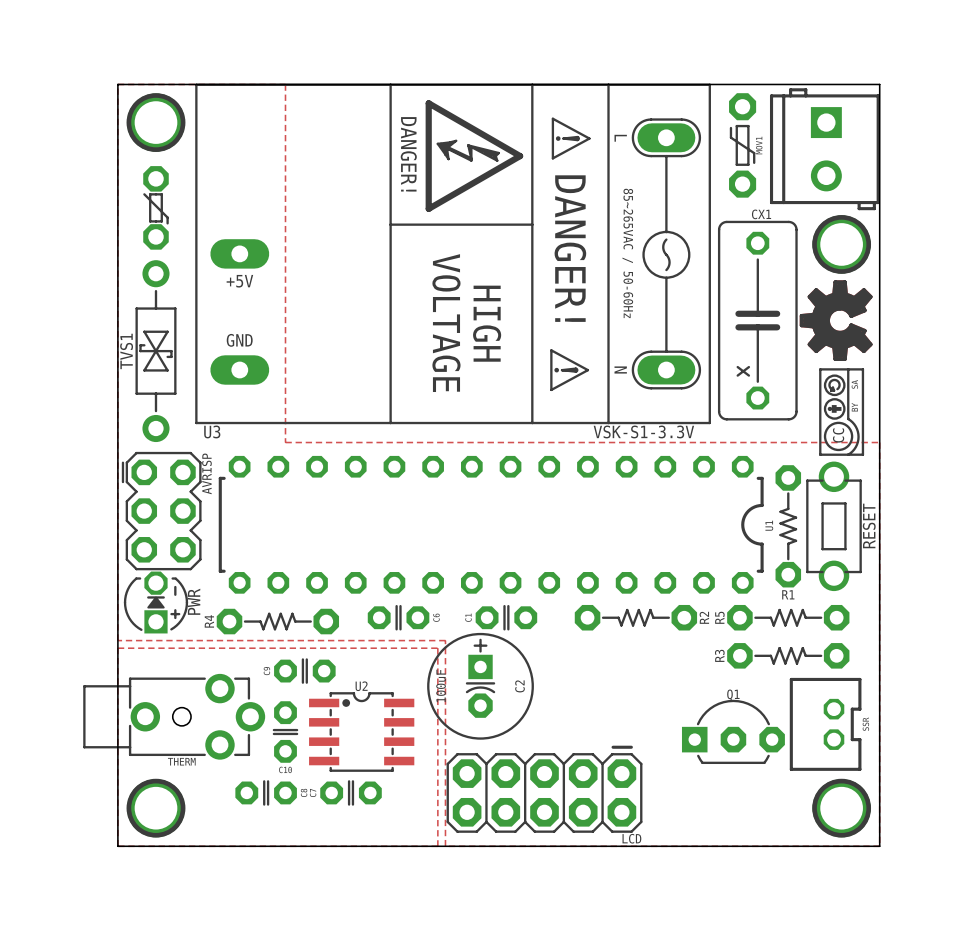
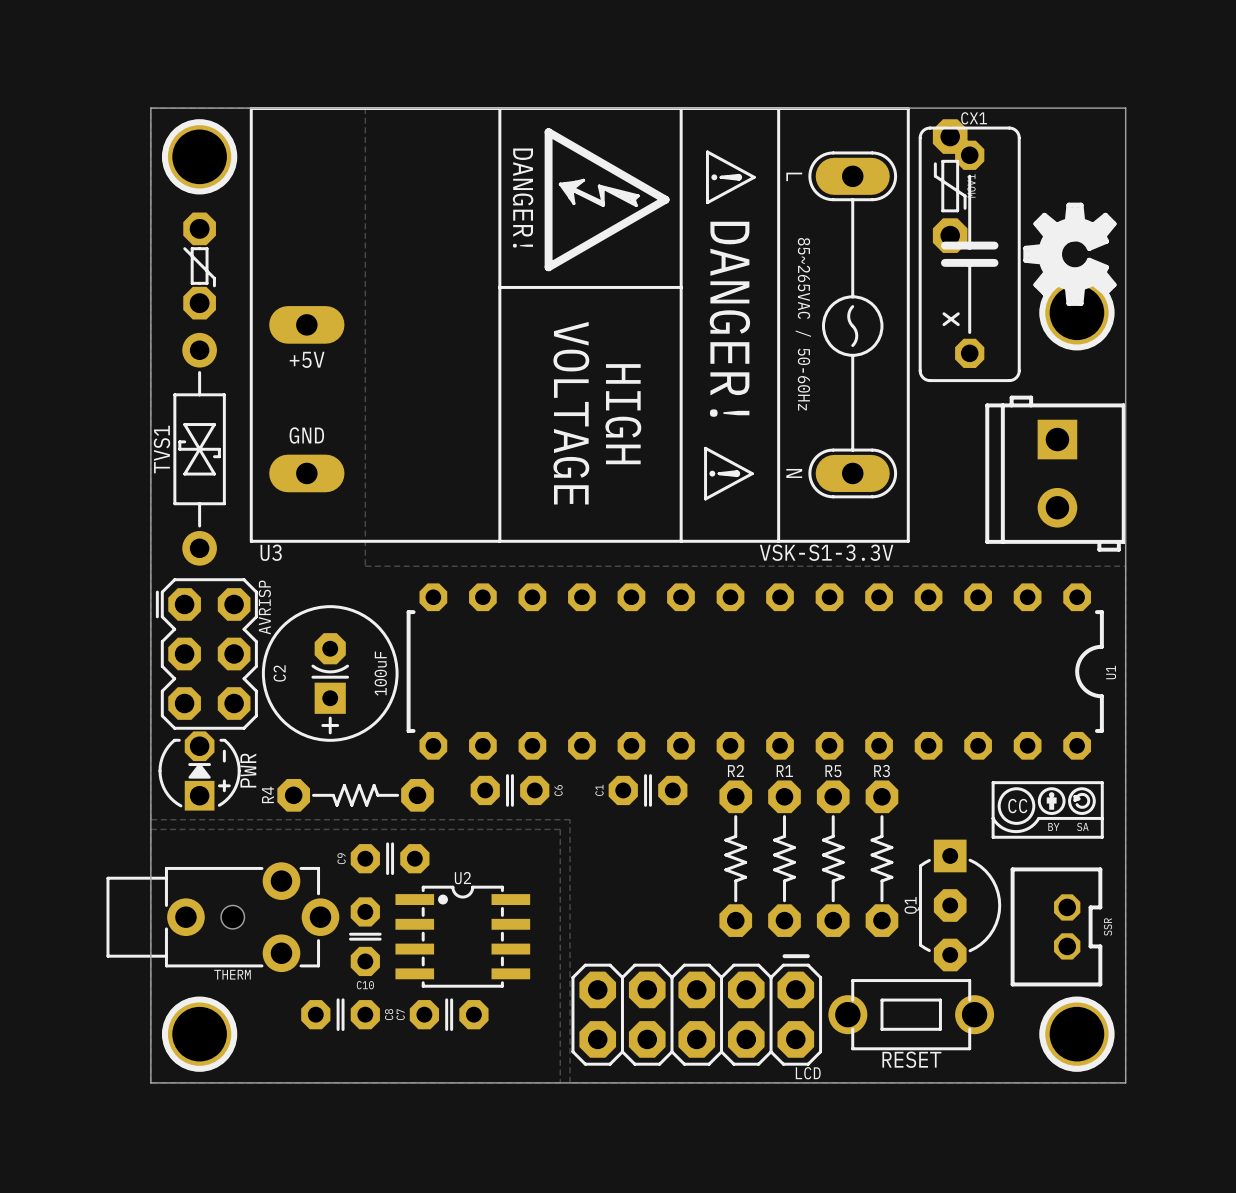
part position: (824, 149) -> (1055, 473)
CX1 position: (757, 320) -> (969, 254)
drawing position: (836, 320) -> (1069, 254)
drawing: [819, 368, 865, 456] -> none
U1 position: (491, 524) -> (755, 671)
R1 position: (788, 526) -> (784, 858)
RESET rotation: 0° (834, 526) -> 90° clockwise (911, 1014)
RESET position: (834, 526) -> (911, 1014)
R1 name position: R1 (788, 594) -> R1 (784, 771)
drawing: none -> [991, 781, 1104, 839]
R2 rotation: 0° (635, 617) -> 90° clockwise (735, 858)
R2 position: (635, 617) -> (735, 858)
R2 name position: R2 (704, 617) -> R2 (735, 770)
R5 rotation: 0° (788, 617) -> 90° clockwise (833, 858)
R5 position: (788, 617) -> (833, 858)
R3 rotation: 0° (788, 655) -> 90° clockwise (881, 858)
R3 position: (788, 655) -> (881, 858)
C2 rotation: 0° (480, 686) -> 180° (330, 673)
C2 position: (480, 686) -> (330, 673)
Q1 name position: Q1 (733, 695) -> Q1 (911, 905)
Q1 rotation: 0° (733, 731) -> 90° clockwise (960, 905)

